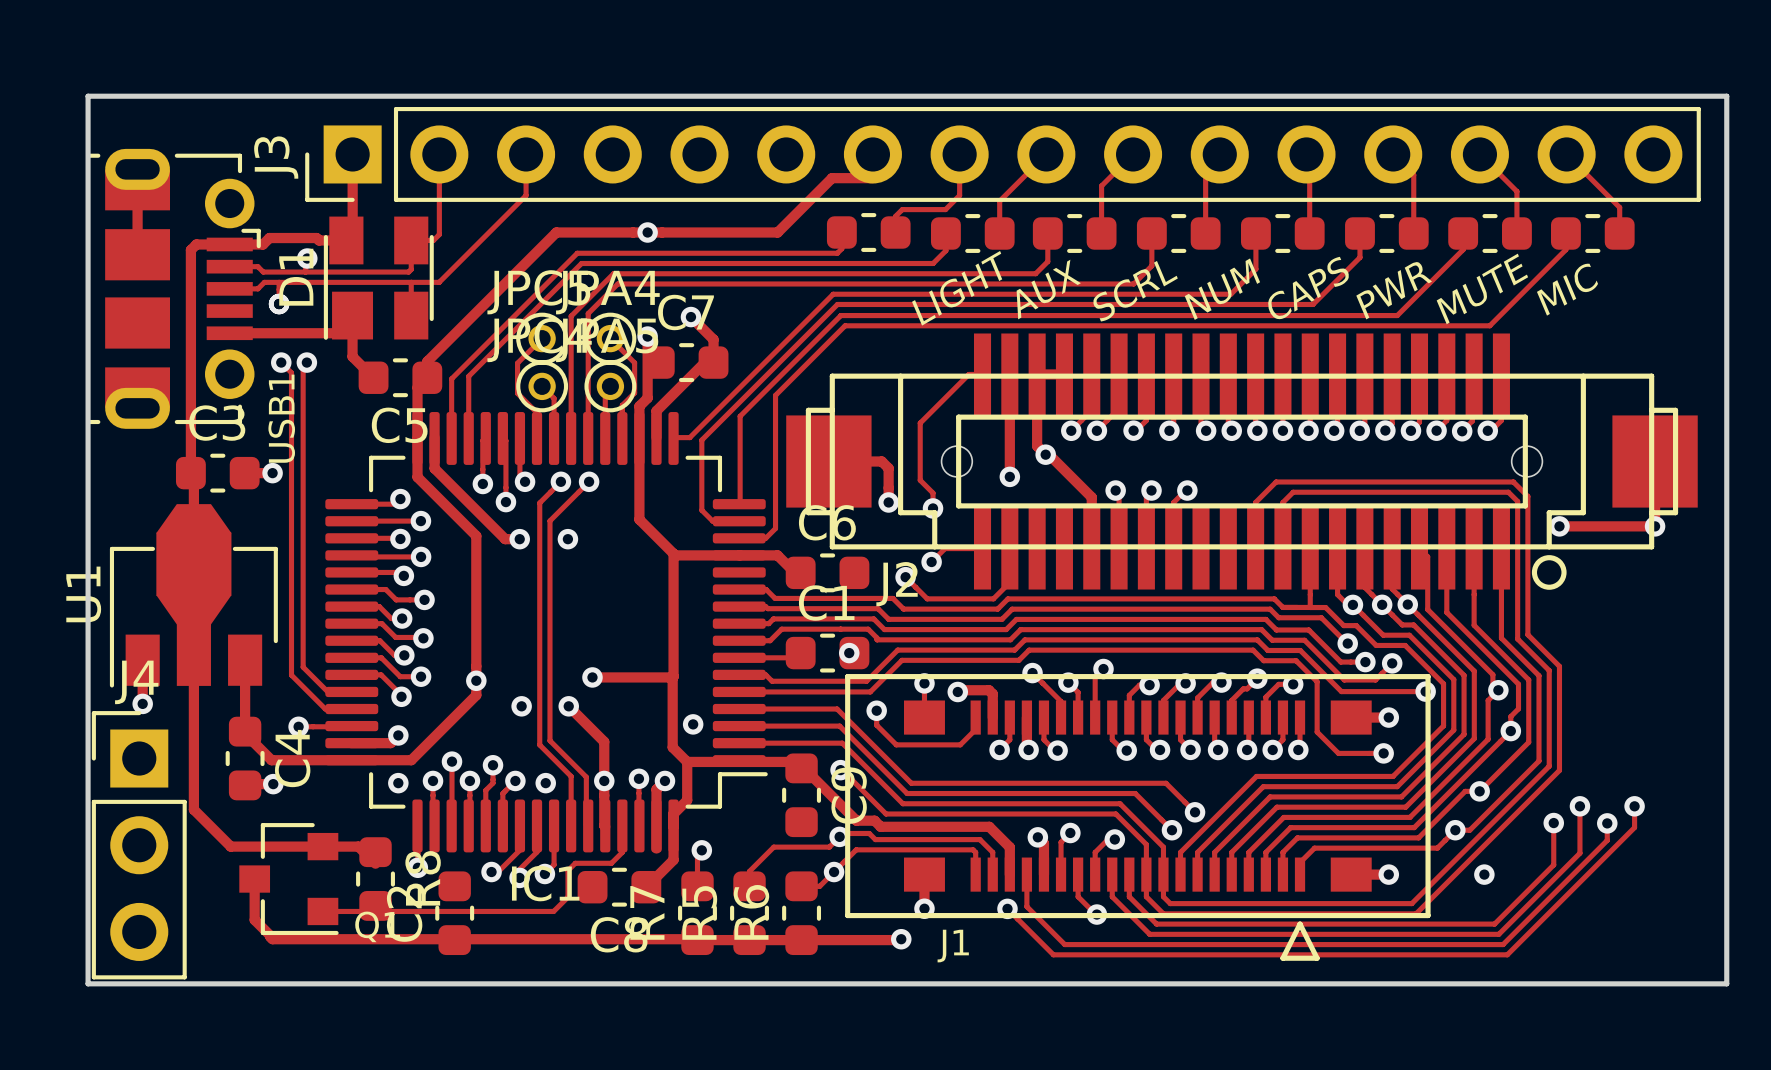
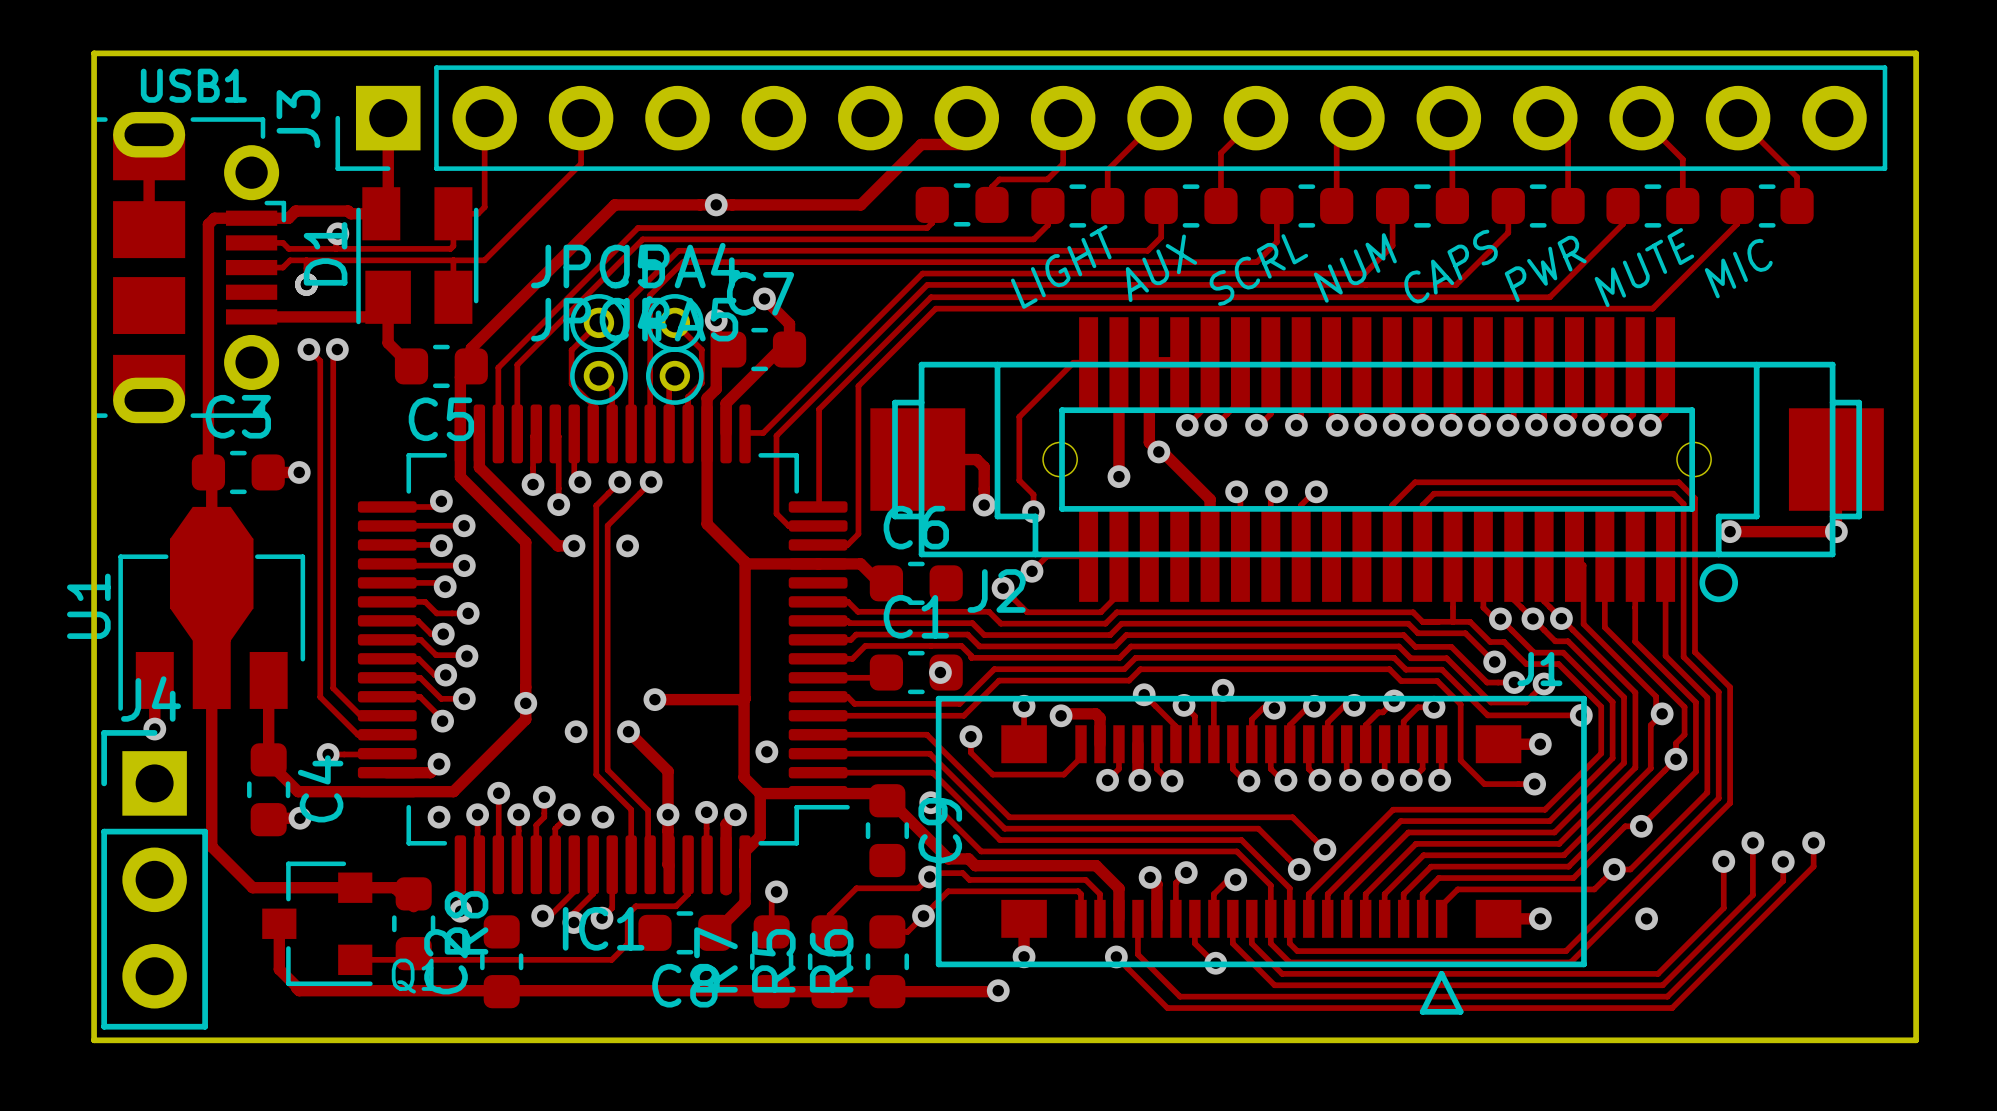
USB1 name rotation: 0° (281, 418) -> 90° clockwise (193, 85)
USB1 name position: USB1 (281, 418) -> USB1 (193, 85)
J4 footprint: [91, 711, 187, 980] -> [101, 730, 208, 1030]
J1 name position: J1 (953, 946) -> J1 (1539, 669)

